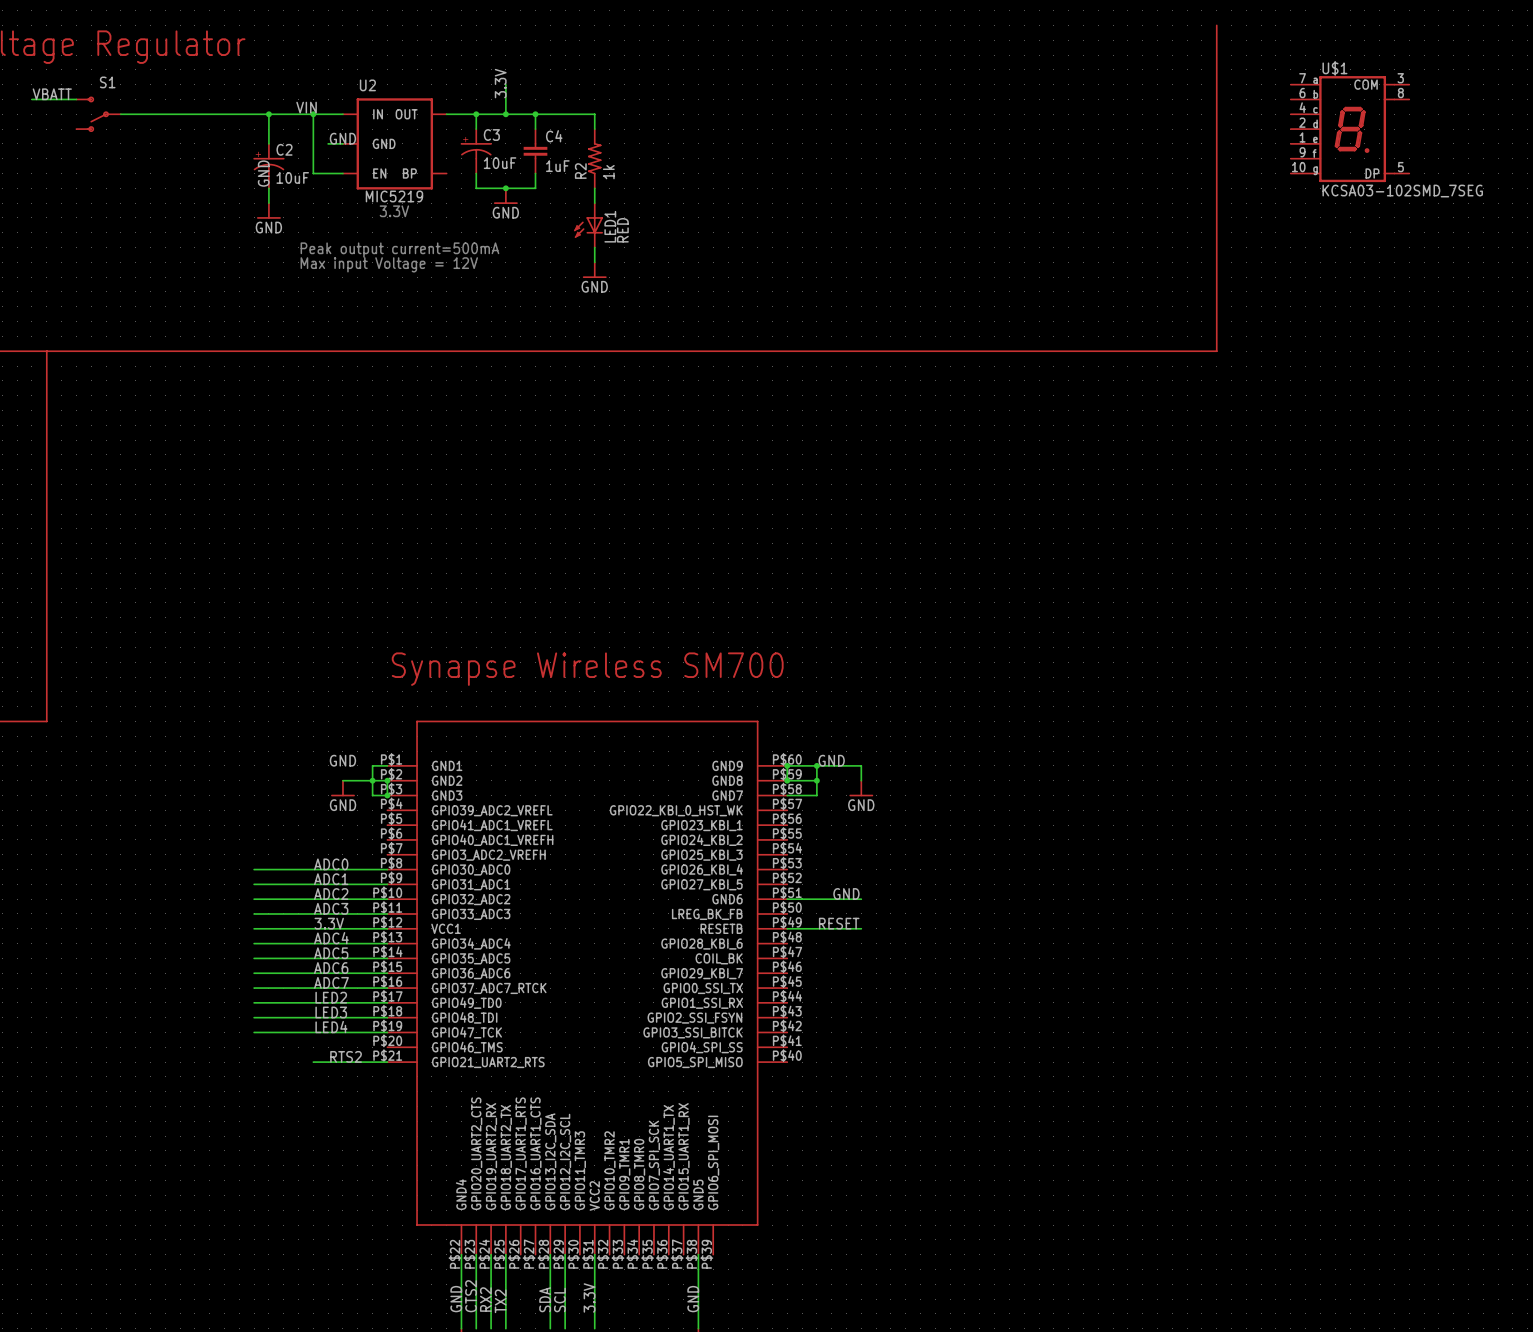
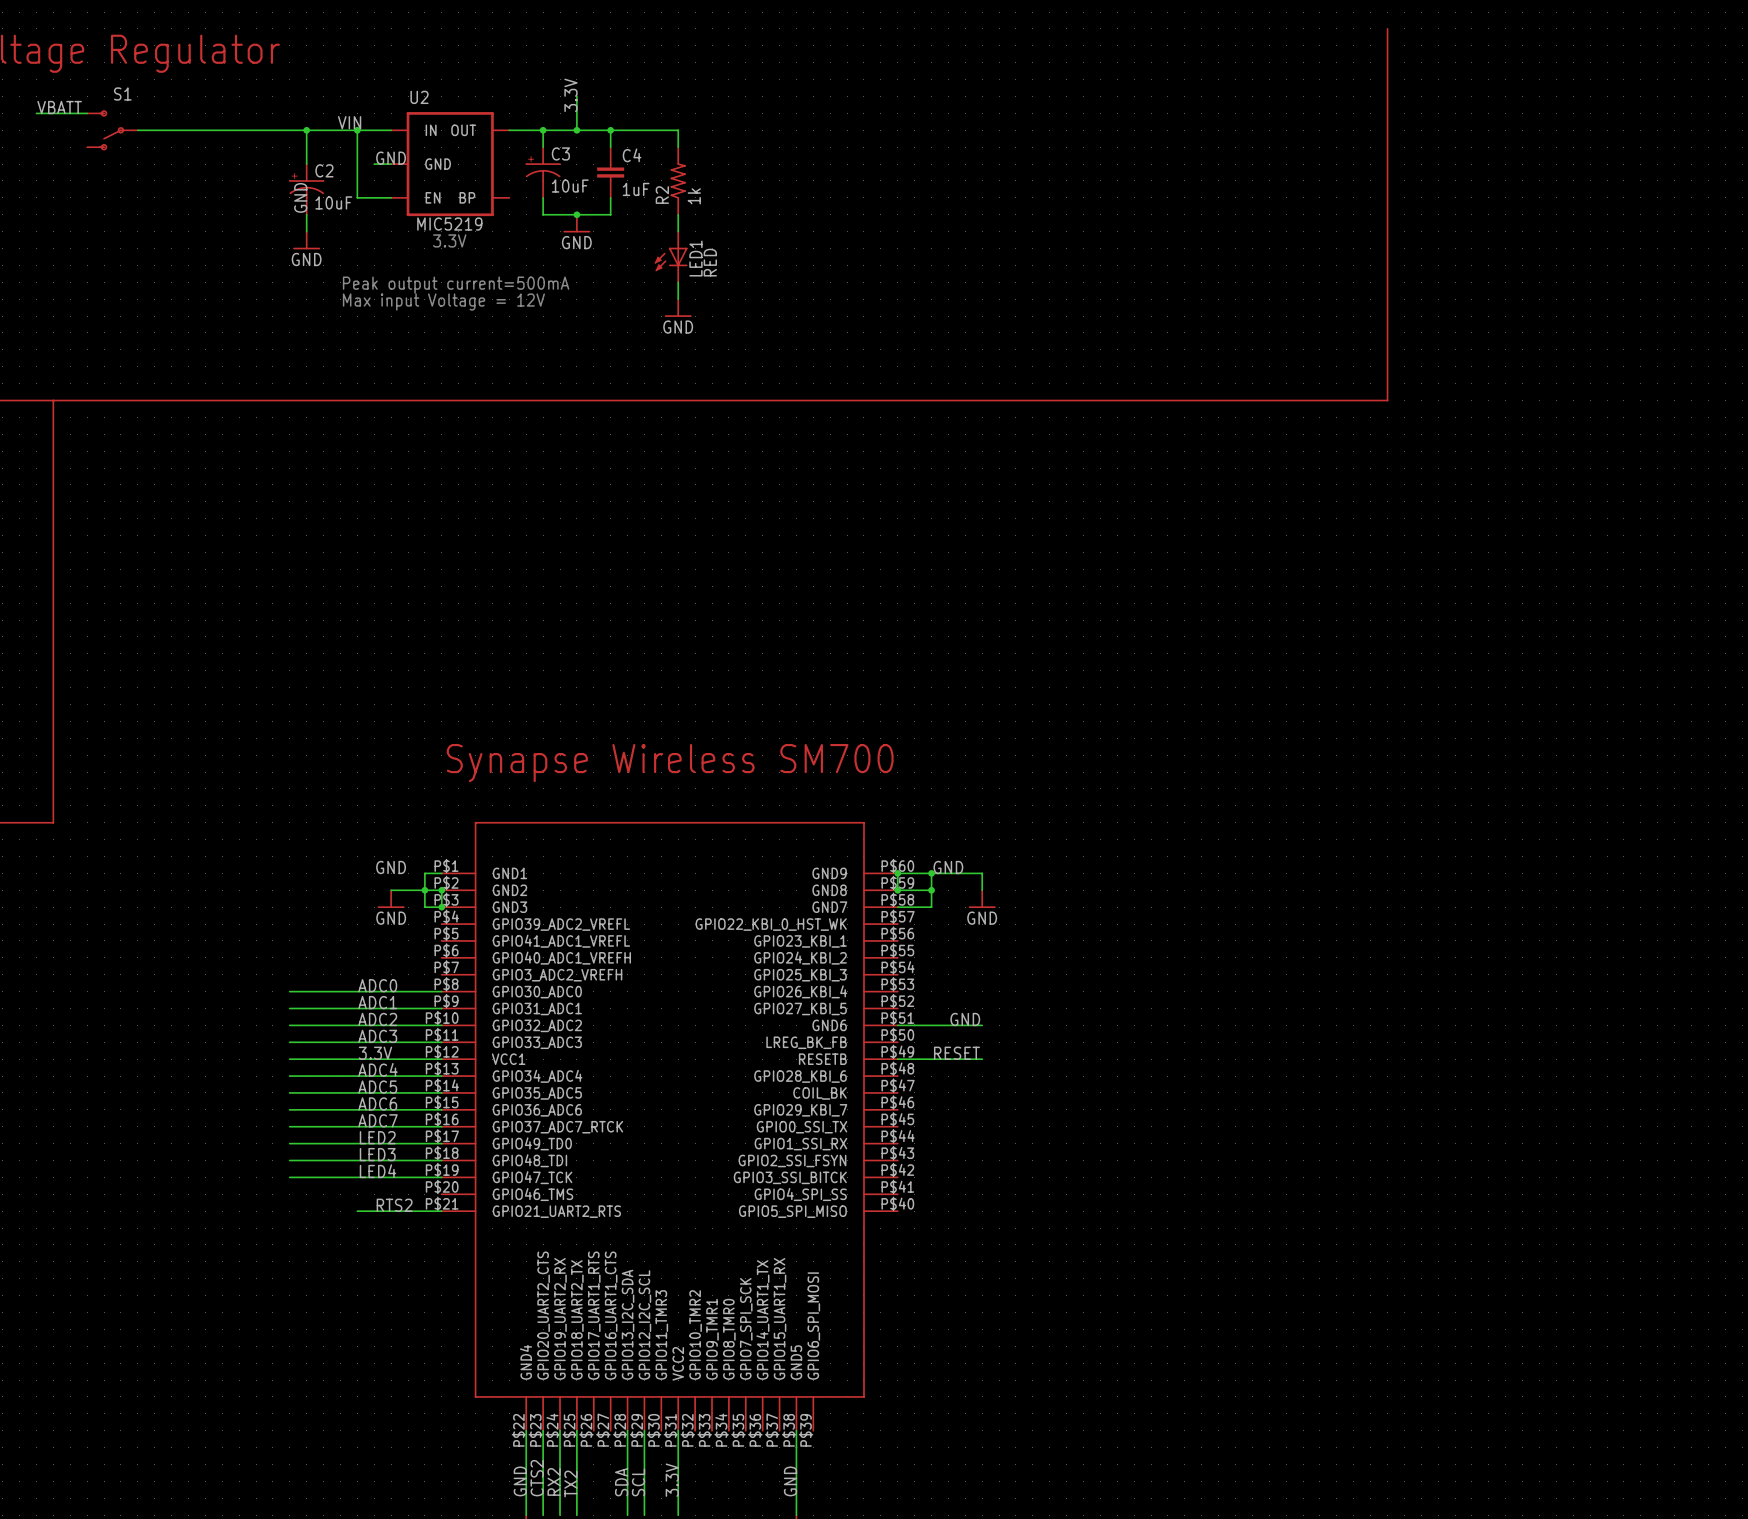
U$1: KCSA03-102SMD_7SEG (1350, 129) -> none

